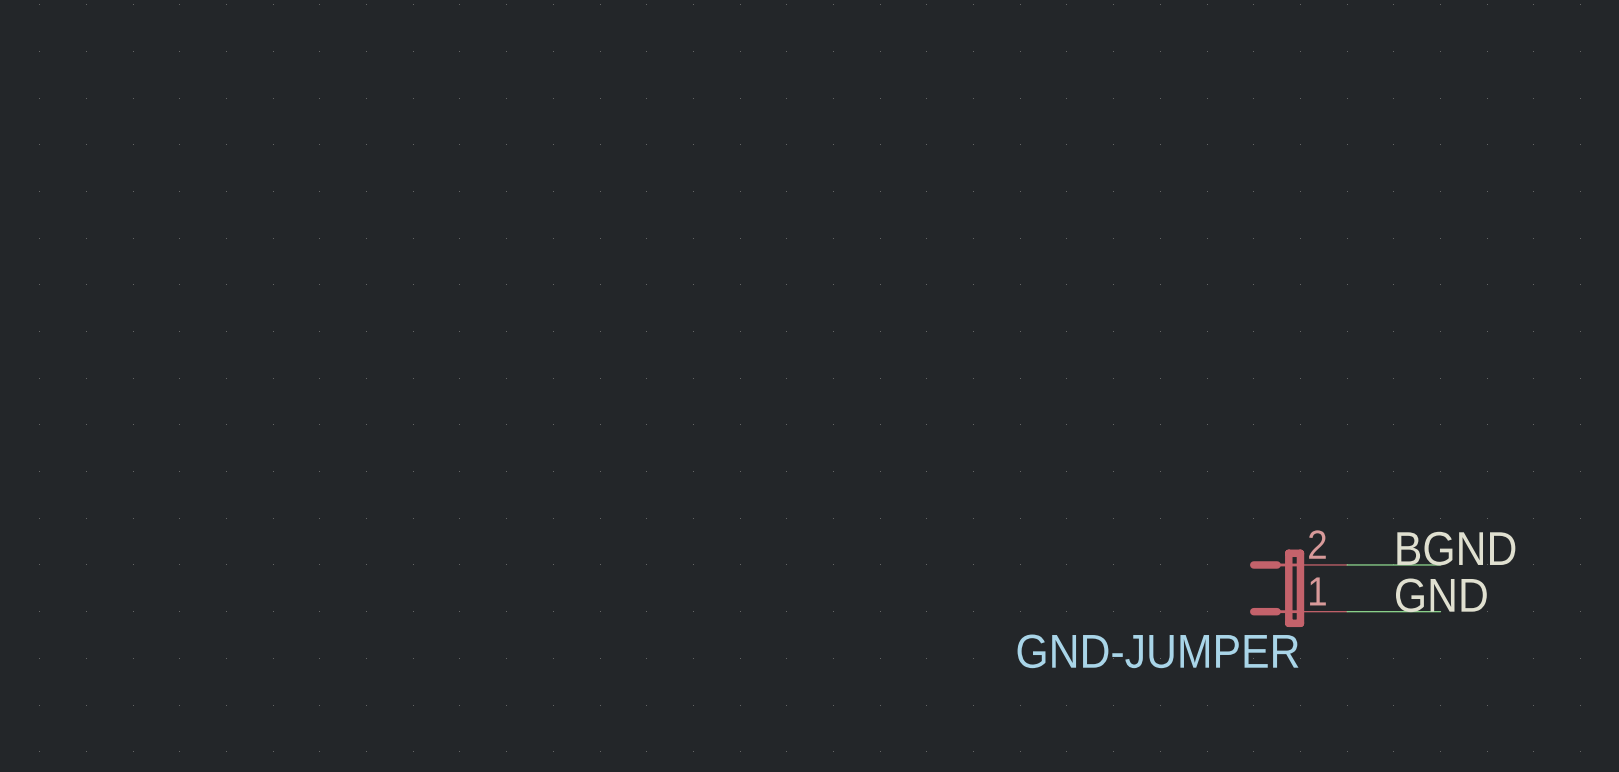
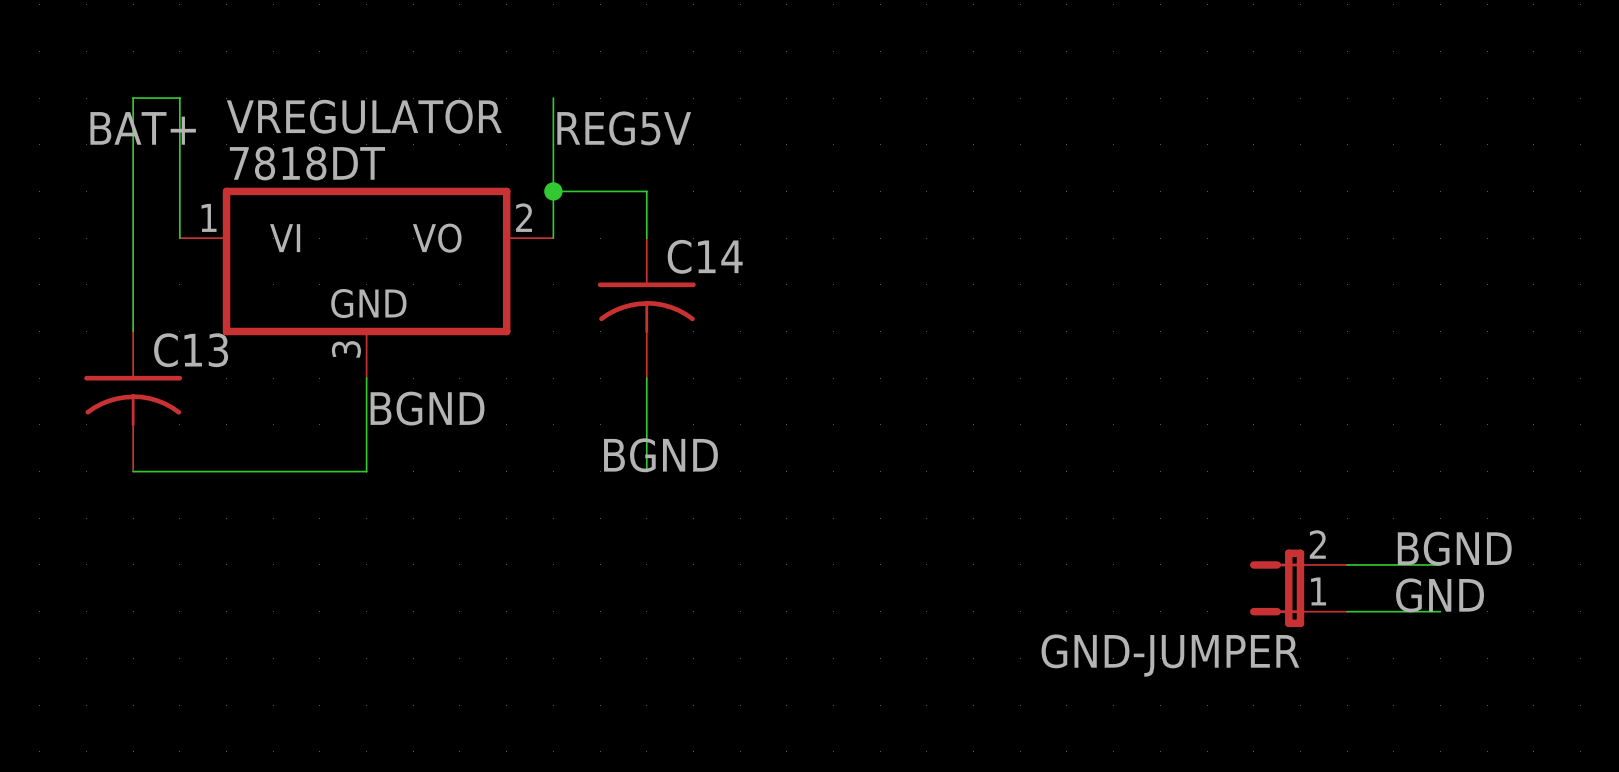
wire: none -> (553, 98) (553, 238)
label: none -> BAT+ (143, 128)
label: none -> REG5V (624, 128)
wire: none -> (553, 191) (646, 191) (646, 238)
junction: none -> (553, 191)
wire: none -> (179, 238) (179, 98) (133, 98) (133, 331)
VREGULATOR: none -> 7818DT (366, 282)
C14: none -> (646, 308)
wire: none -> (366, 378) (366, 471) (133, 471)
wire: none -> (646, 378) (646, 471)
C13: none -> (133, 401)
label: none -> BGND (427, 408)
label: none -> BGND (660, 455)

